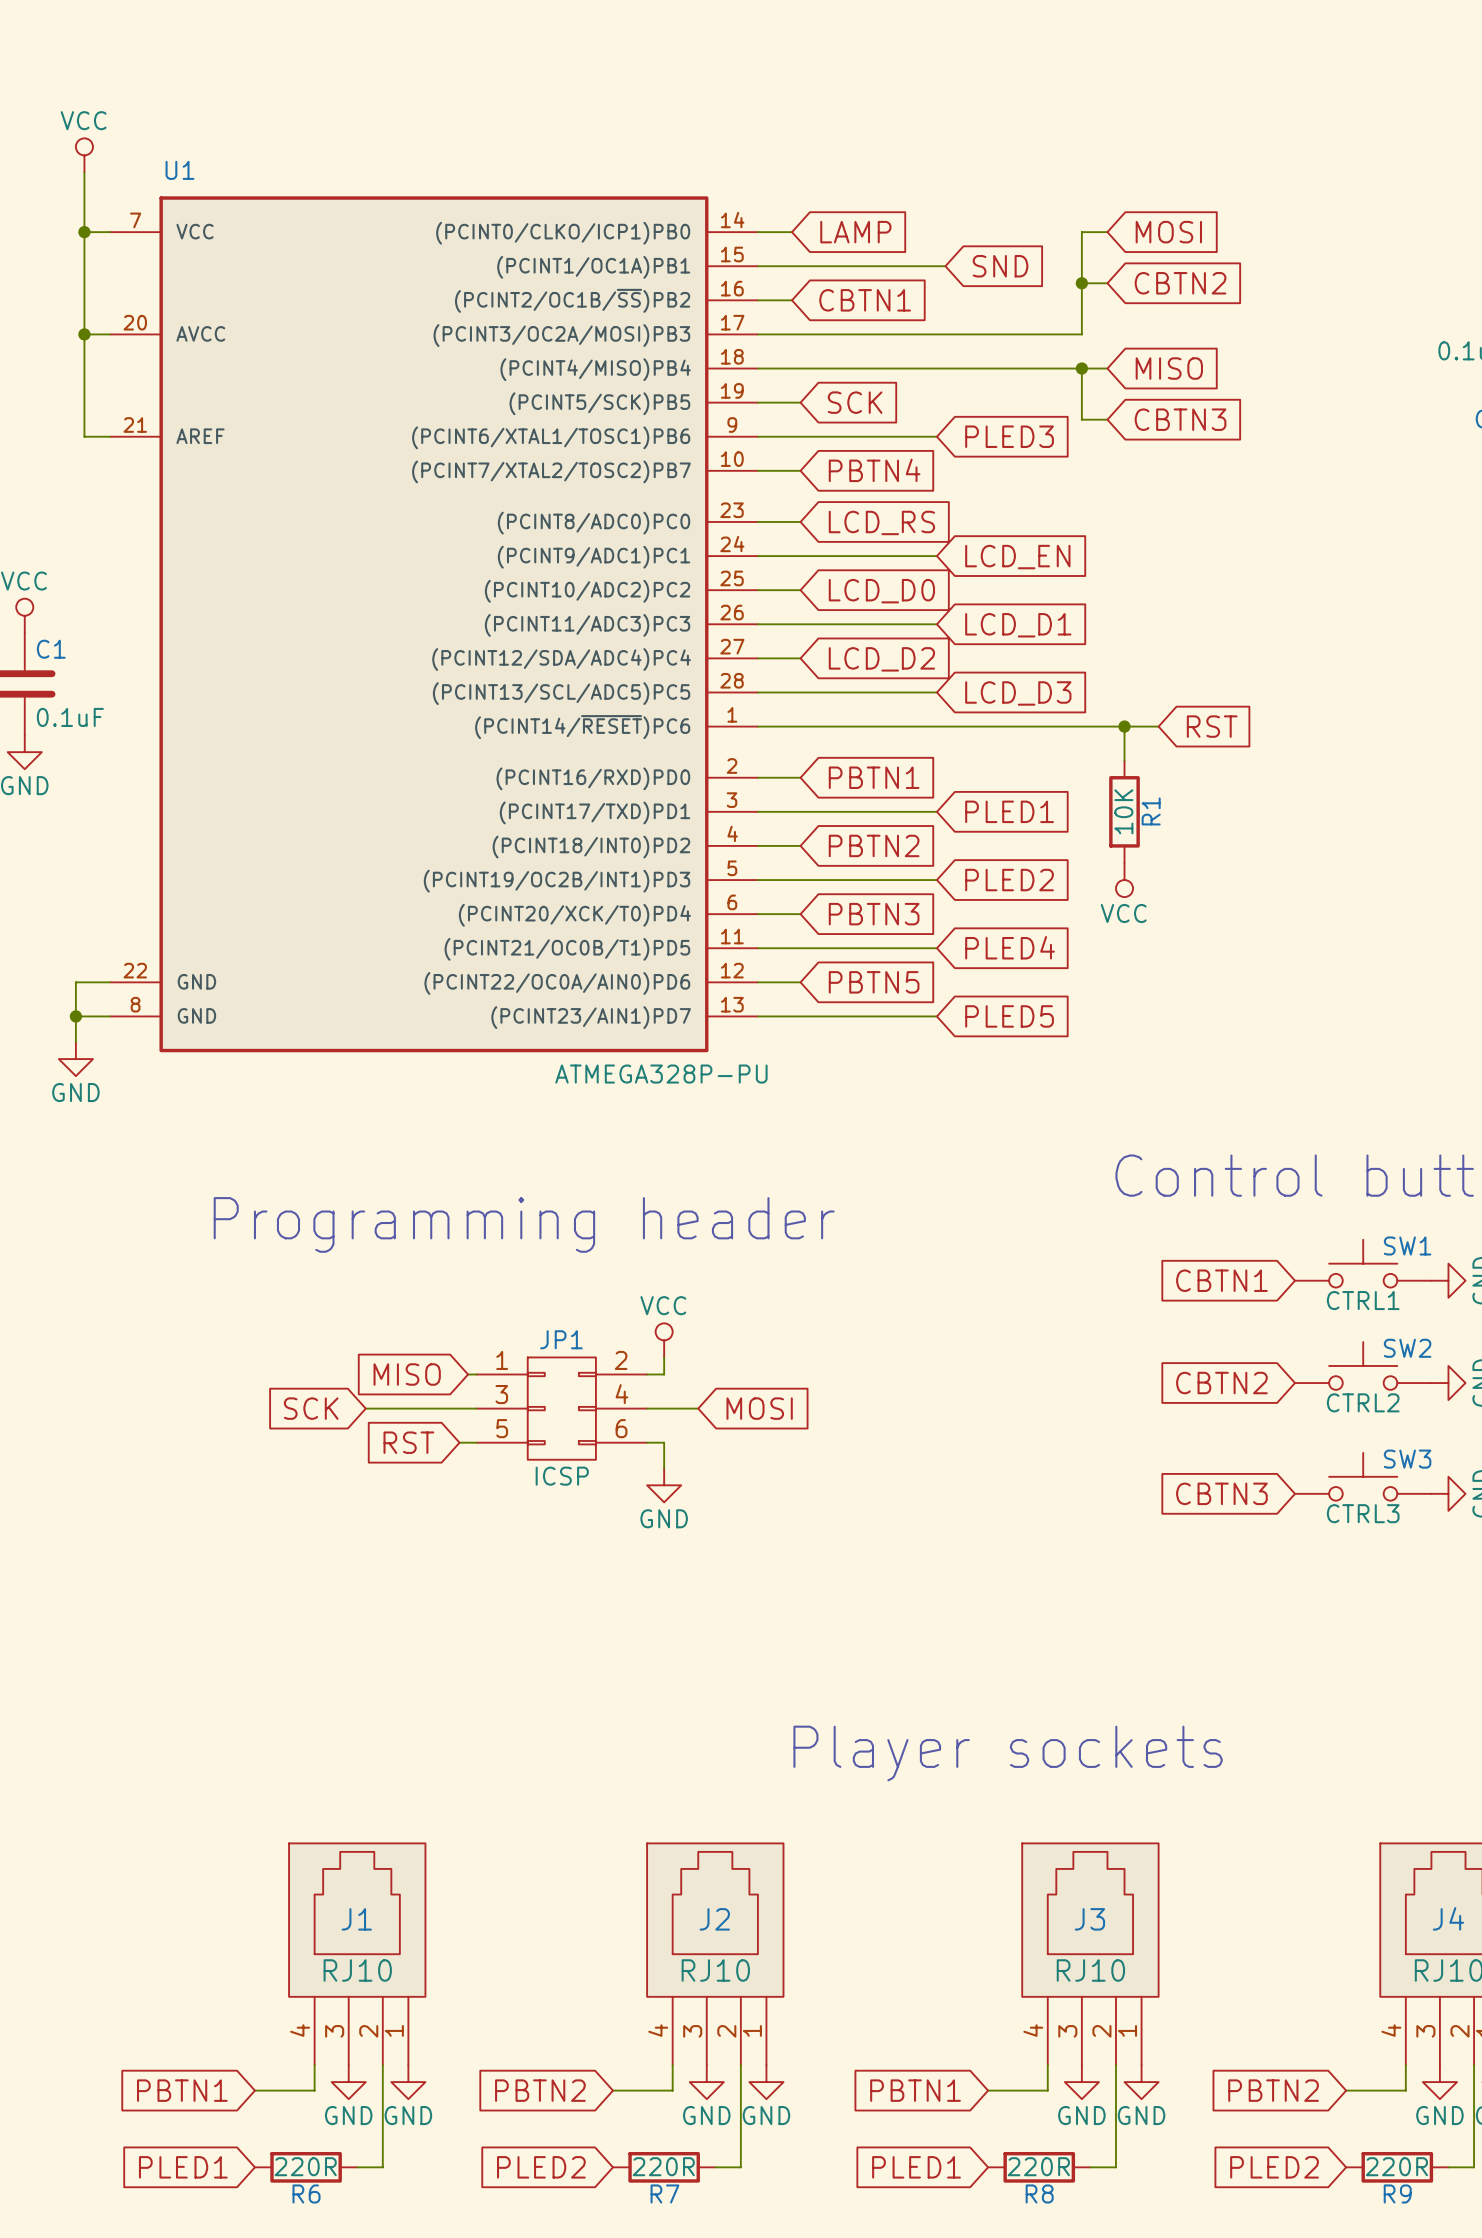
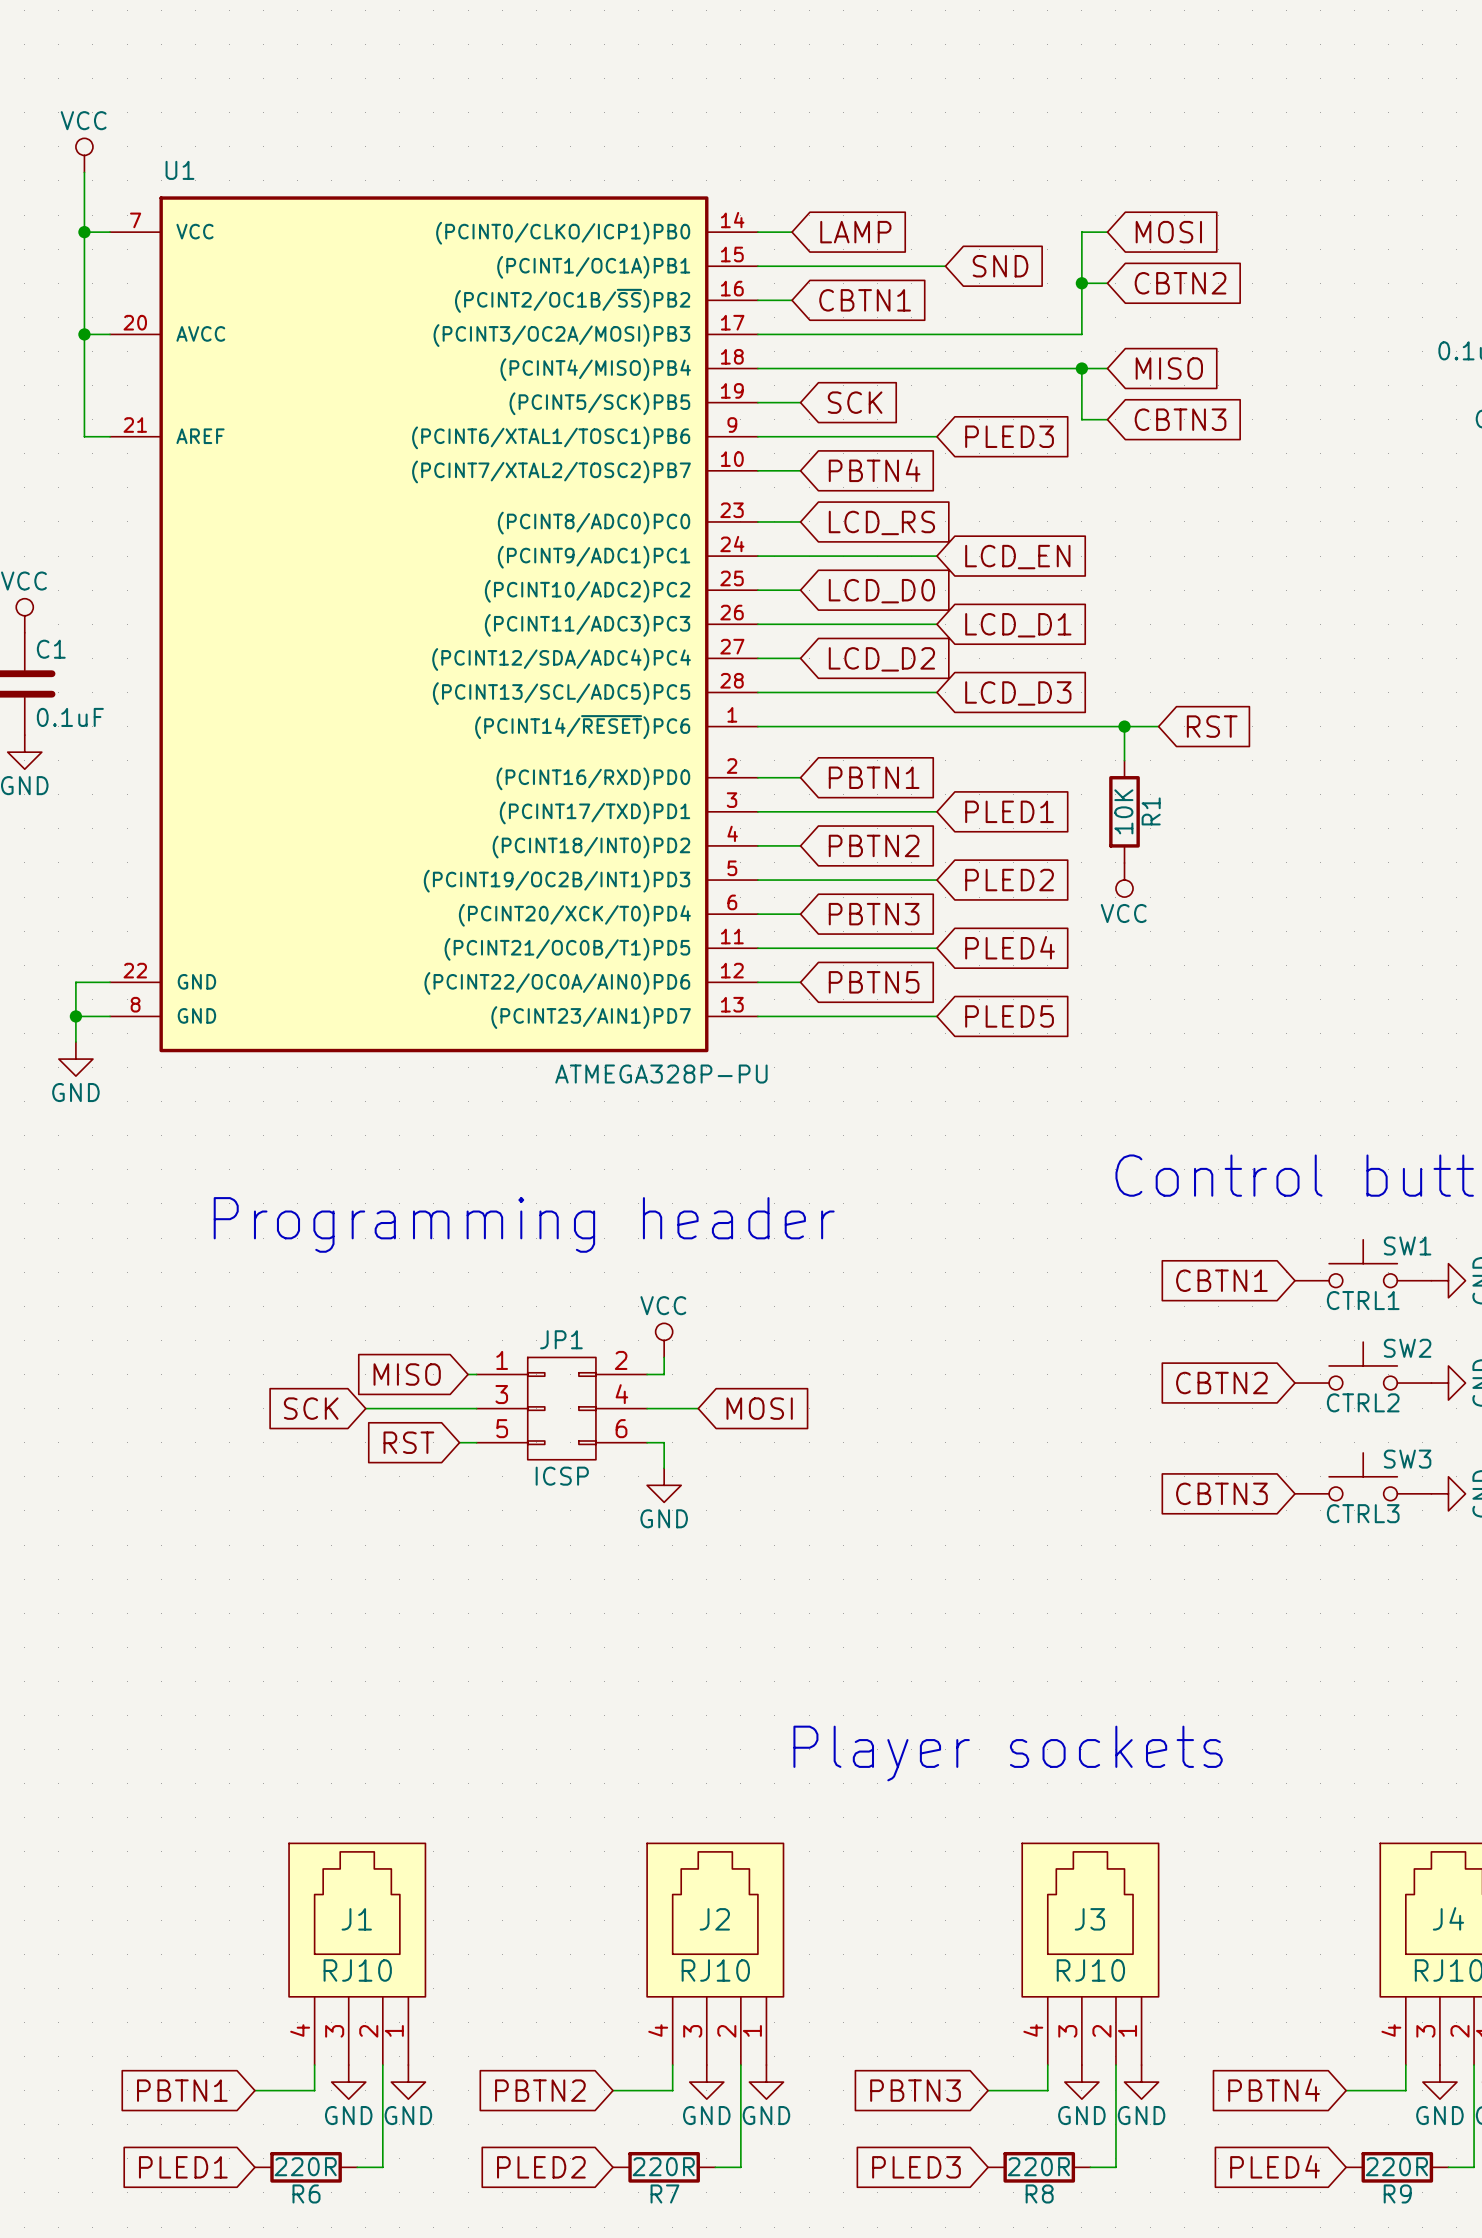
global label: PBTN1 (915, 2090) -> PBTN3 (915, 2090)
global label: PBTN2 (1273, 2090) -> PBTN4 (1274, 2090)
global label: PLED1 (916, 2167) -> PLED3 (916, 2167)
global label: PLED2 (1274, 2167) -> PLED4 (1275, 2166)

